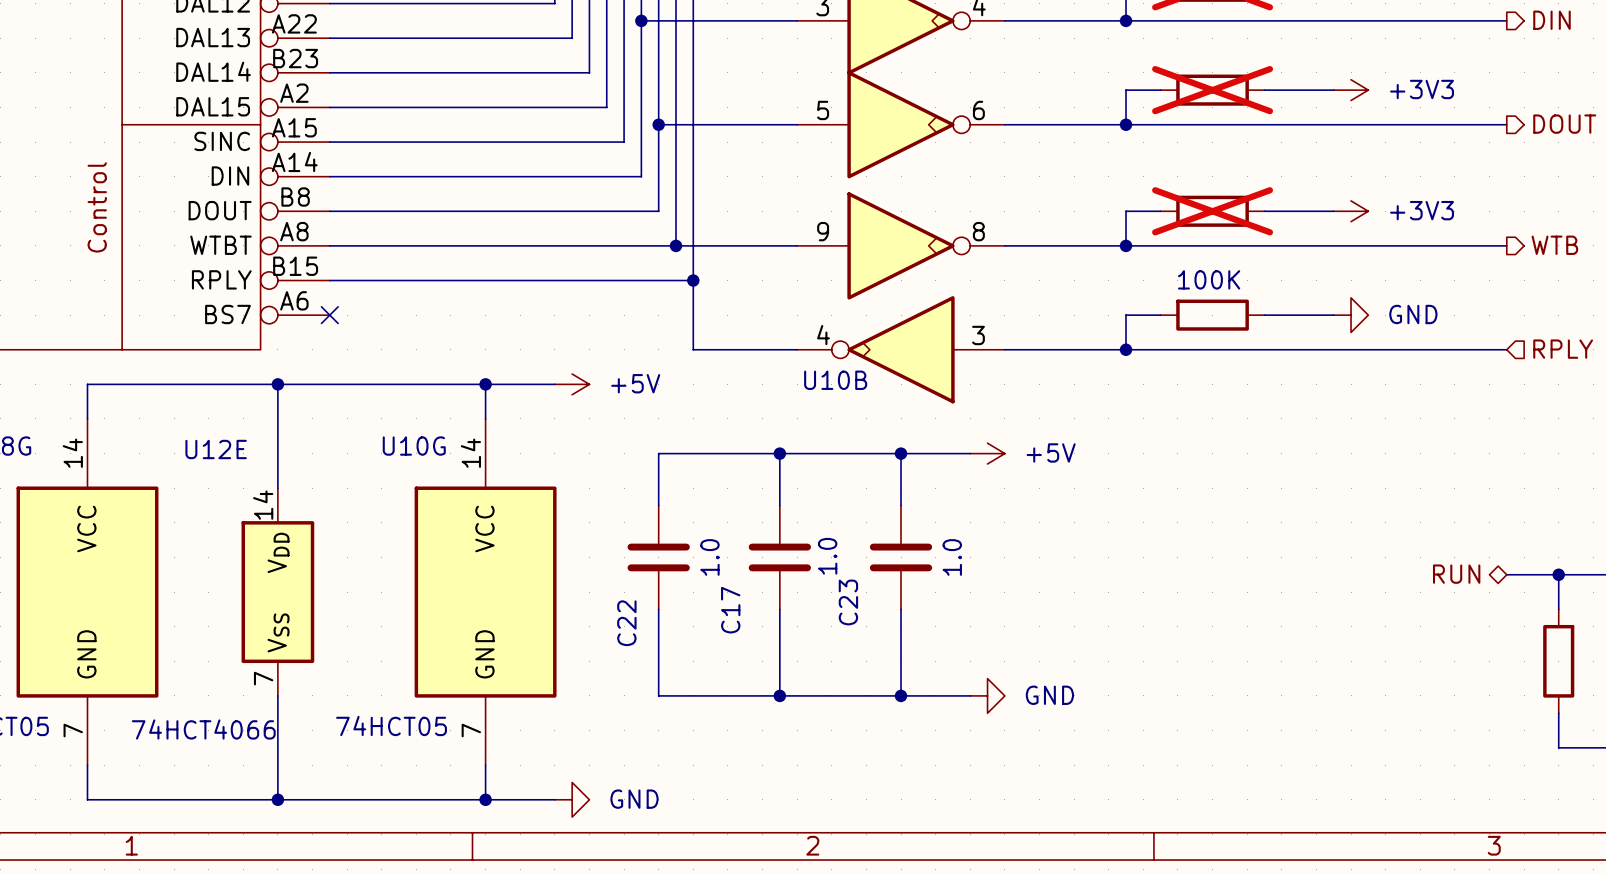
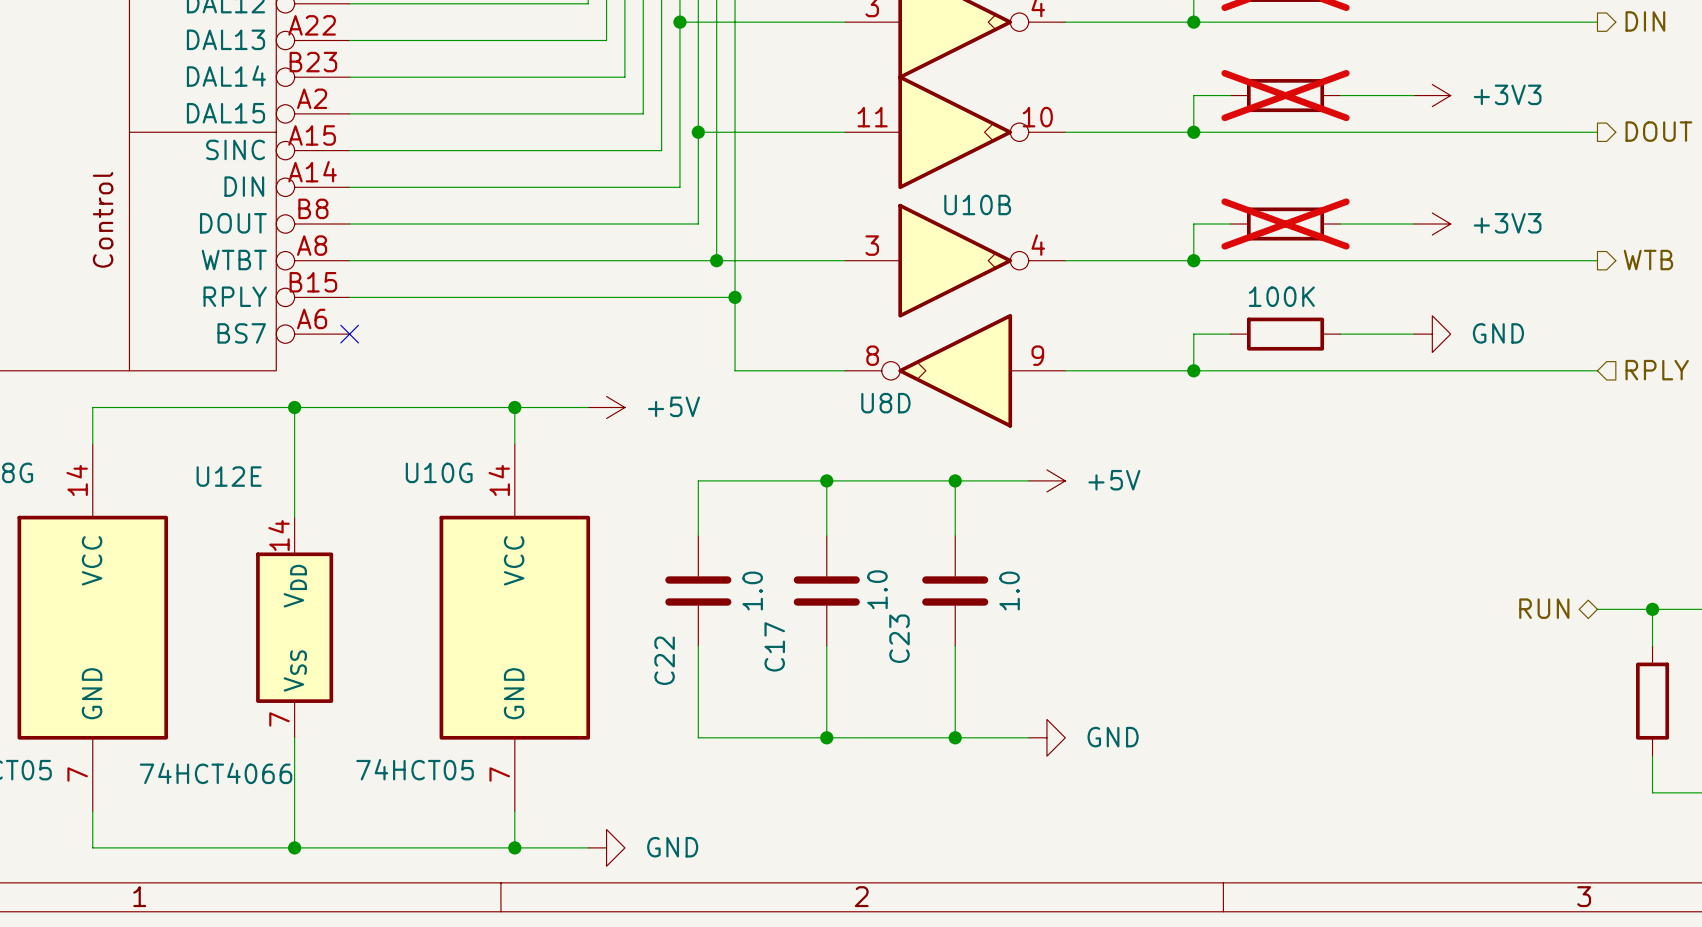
part pin number: 5 (823, 110) -> 11 (872, 117)
part pin number: 6 (978, 110) -> 10 (1037, 117)
part: (901, 245) -> none
U10B rotation: 0° (901, 349) -> 180° (955, 260)
U8D: none -> (955, 370)
U10B name position: U10B (835, 380) -> U10B (977, 204)

